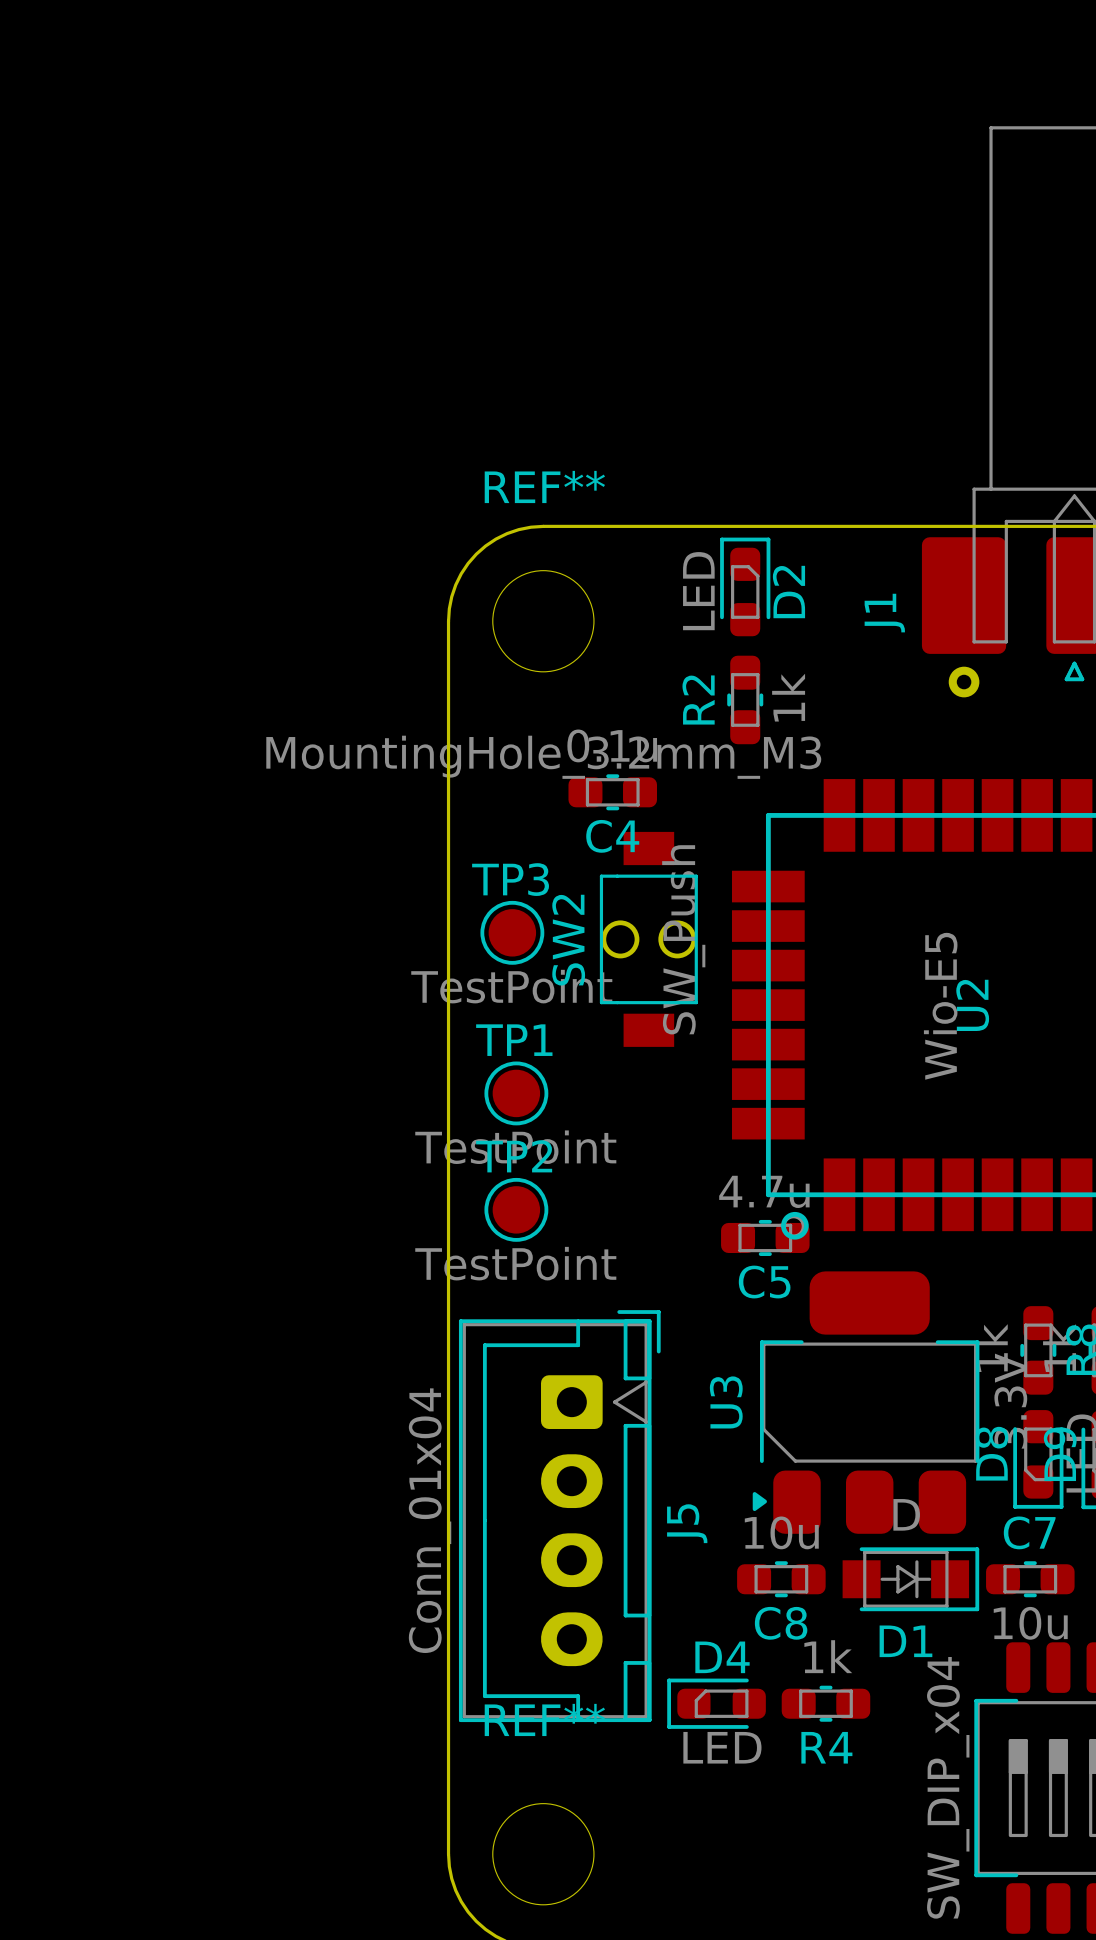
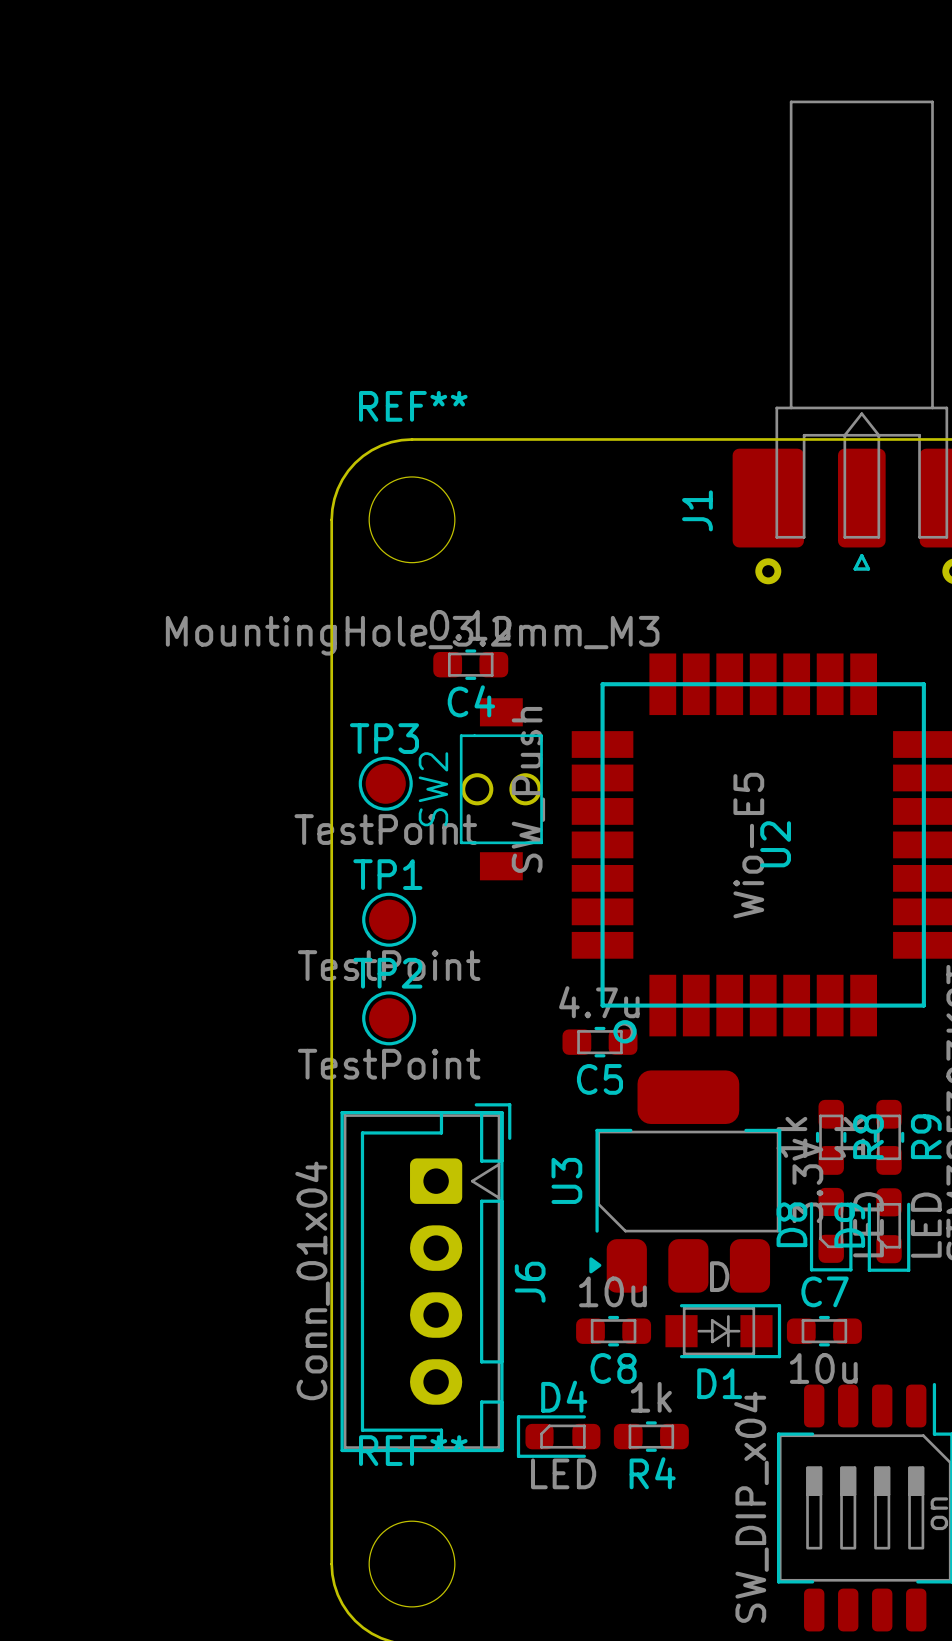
D2: LED (745, 586) -> none
R2: 1k (745, 699) -> none
J5 name: J5 (687, 1523) -> J6 (530, 1282)

